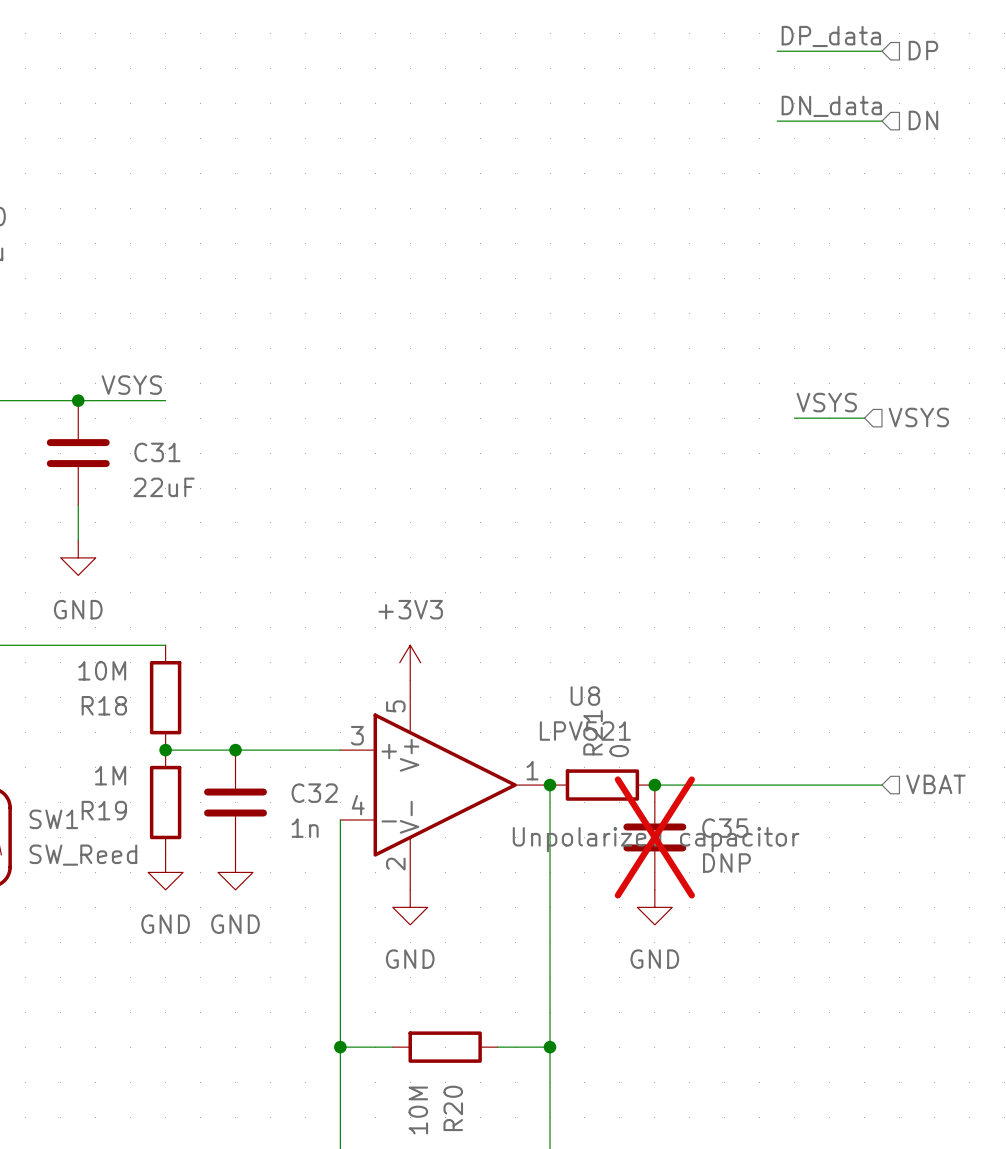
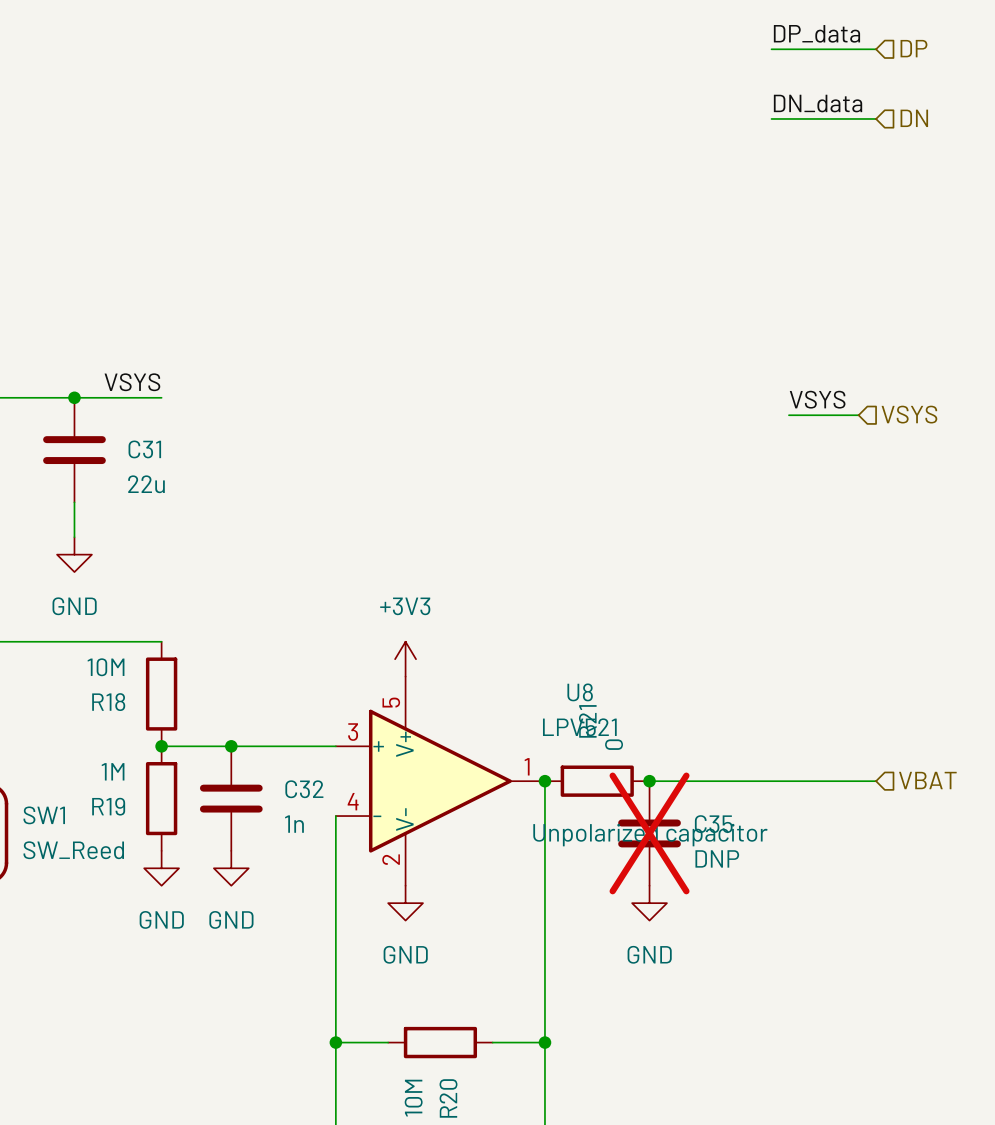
C31 value: 22uF (164, 487) -> 22u (146, 484)

